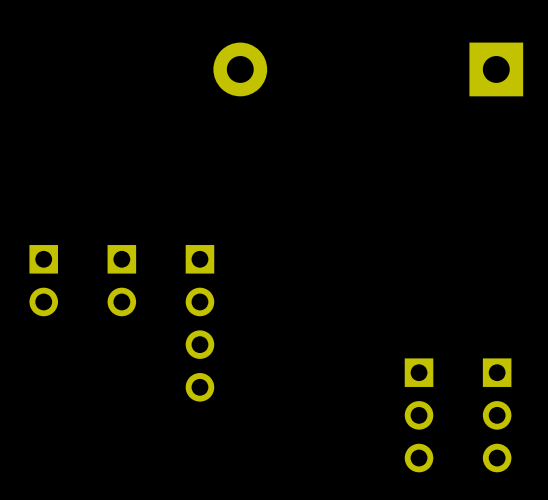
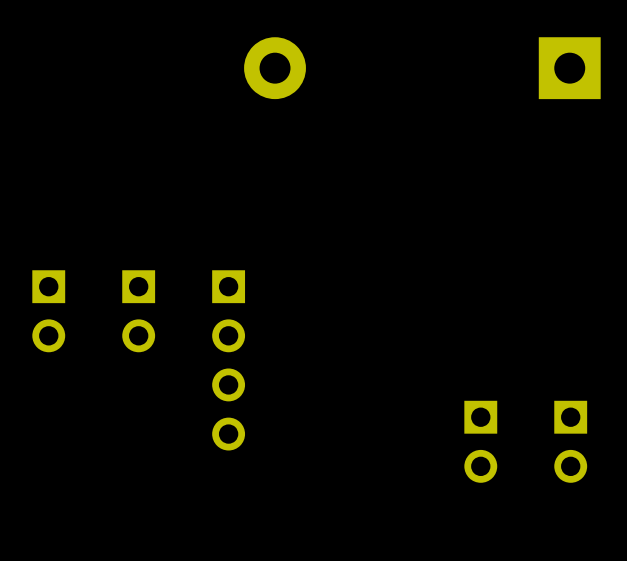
part: (419, 415) -> none
part: (497, 415) -> none

